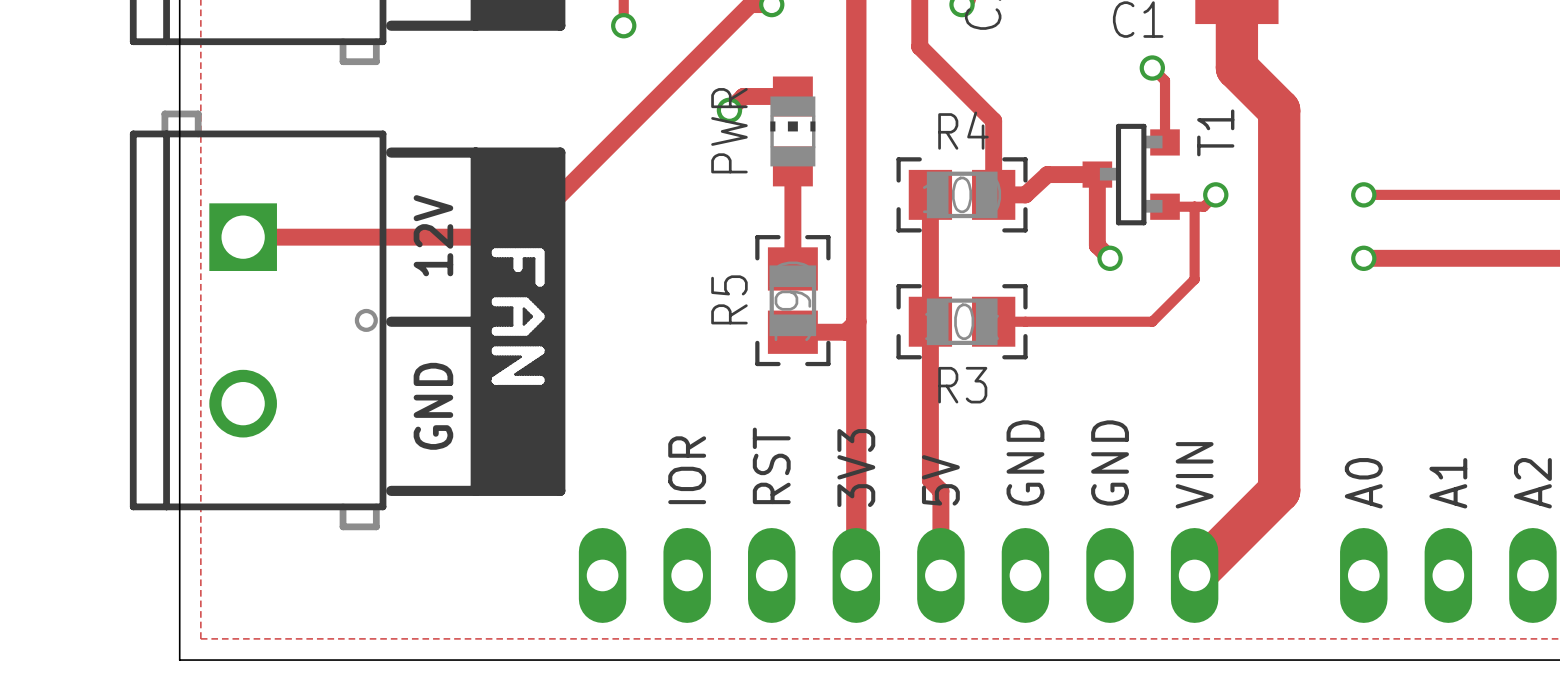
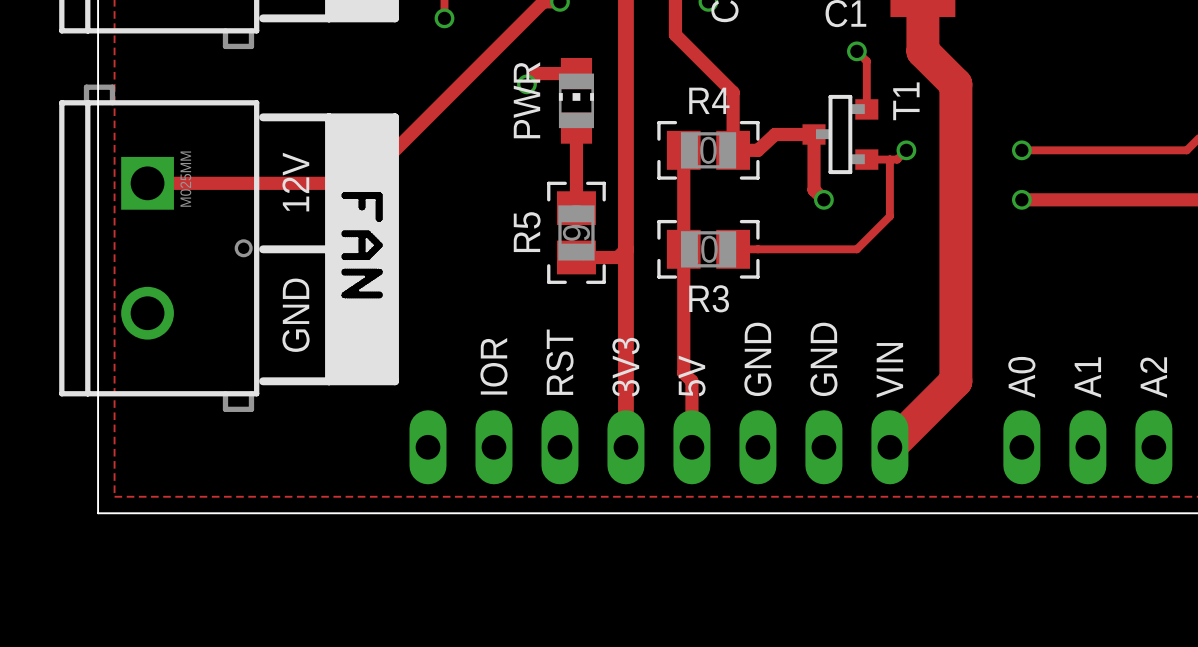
part value: none -> M025MM (185, 179)

